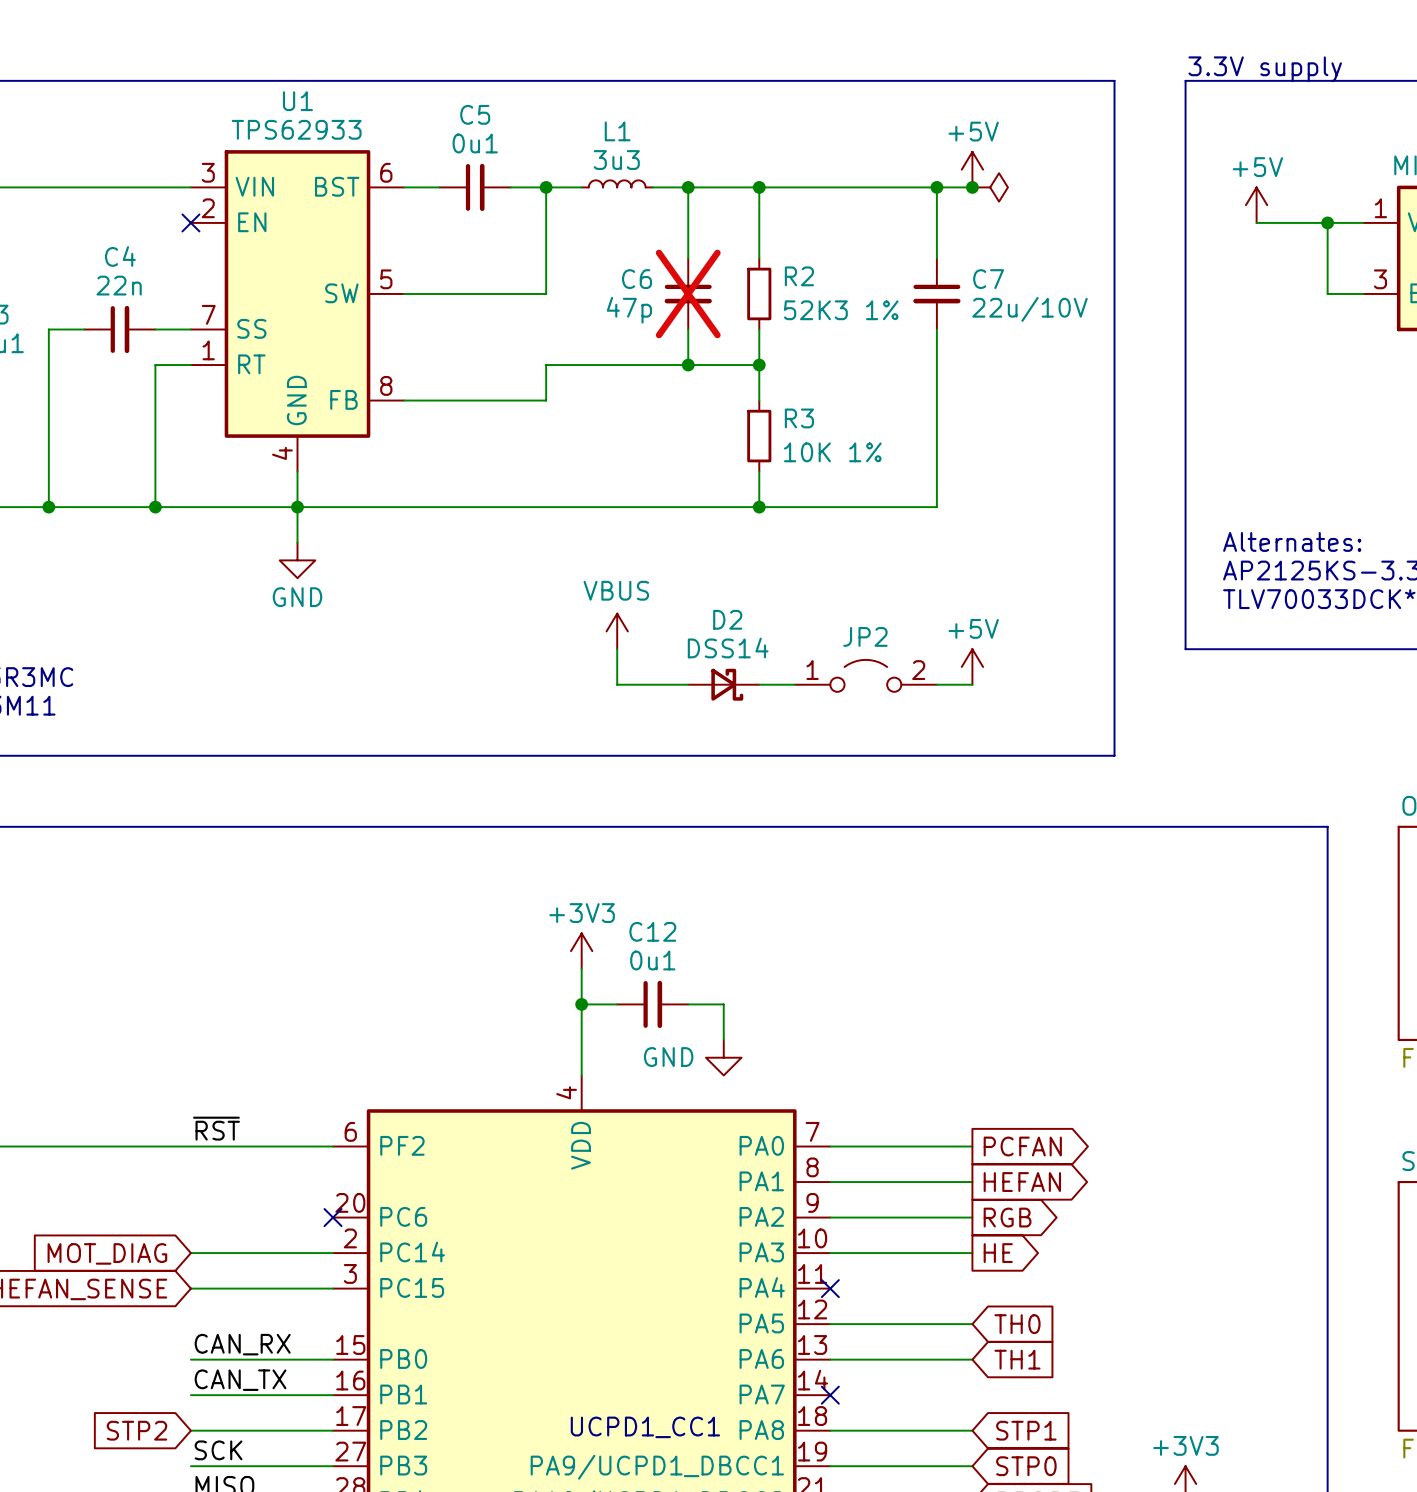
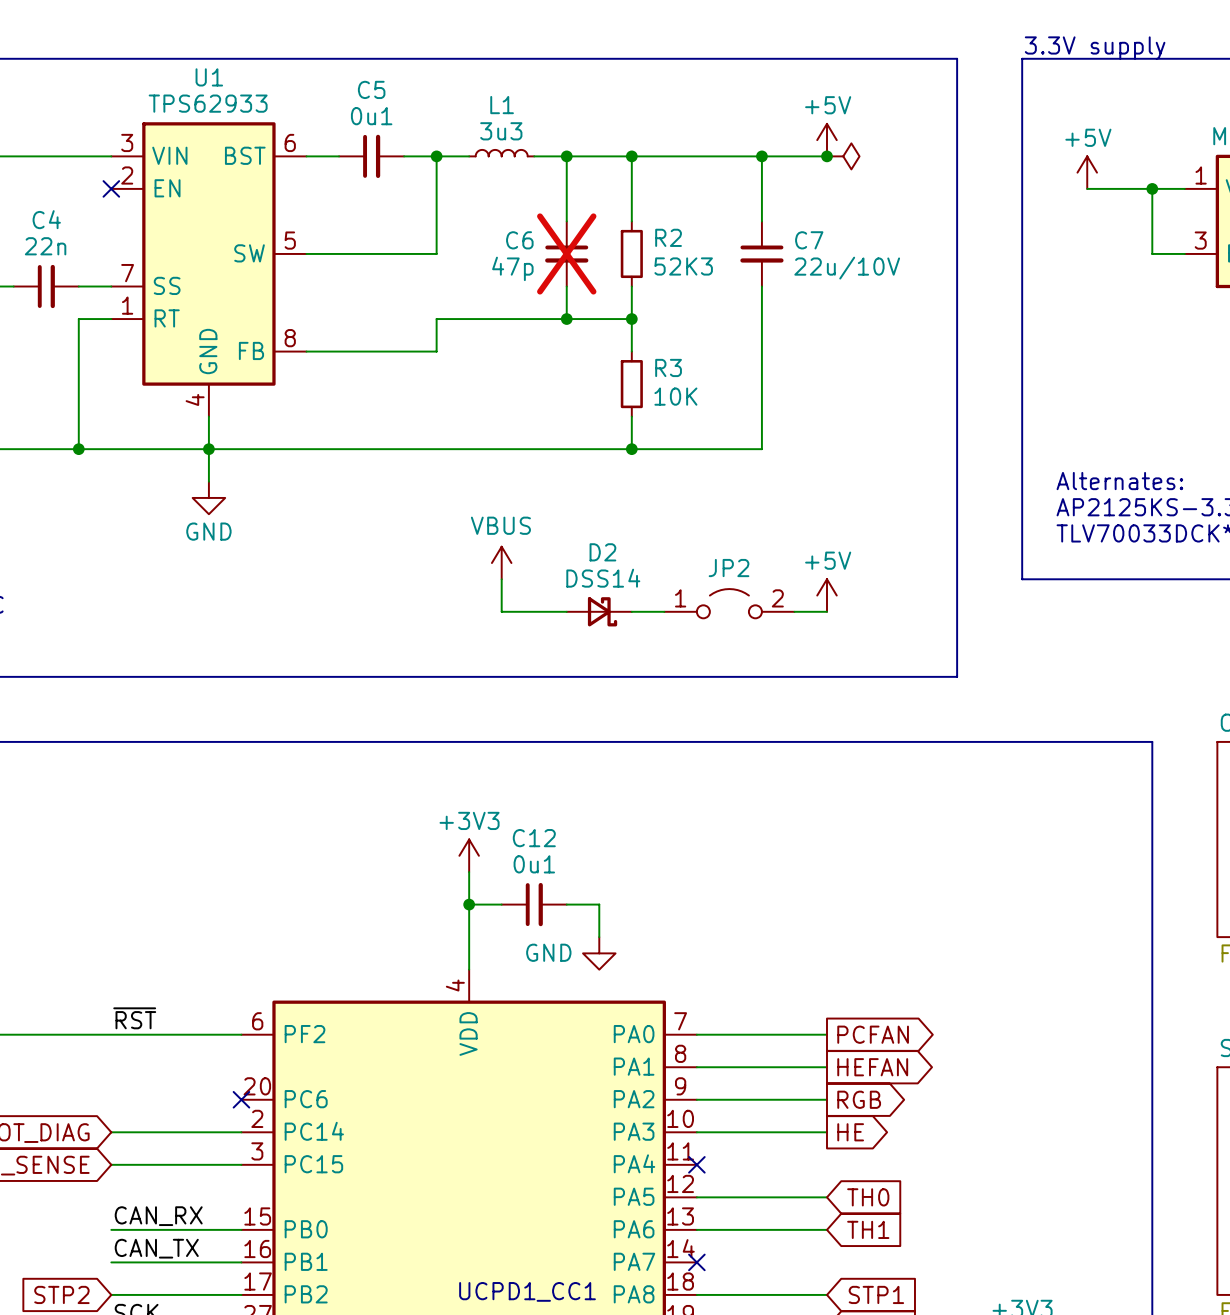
wire: (936, 187) (936, 258) -> (761, 156) (761, 221)
junction position: (936, 187) -> (761, 156)
C7 position: (936, 293) -> (761, 253)
R2 value: 52K3 1% (841, 310) -> 52K3 (683, 266)
wire: (936, 329) (936, 507) (901, 507) -> (761, 286) (761, 449)
R3 value: 10K 1% (832, 452) -> 10K (675, 396)

